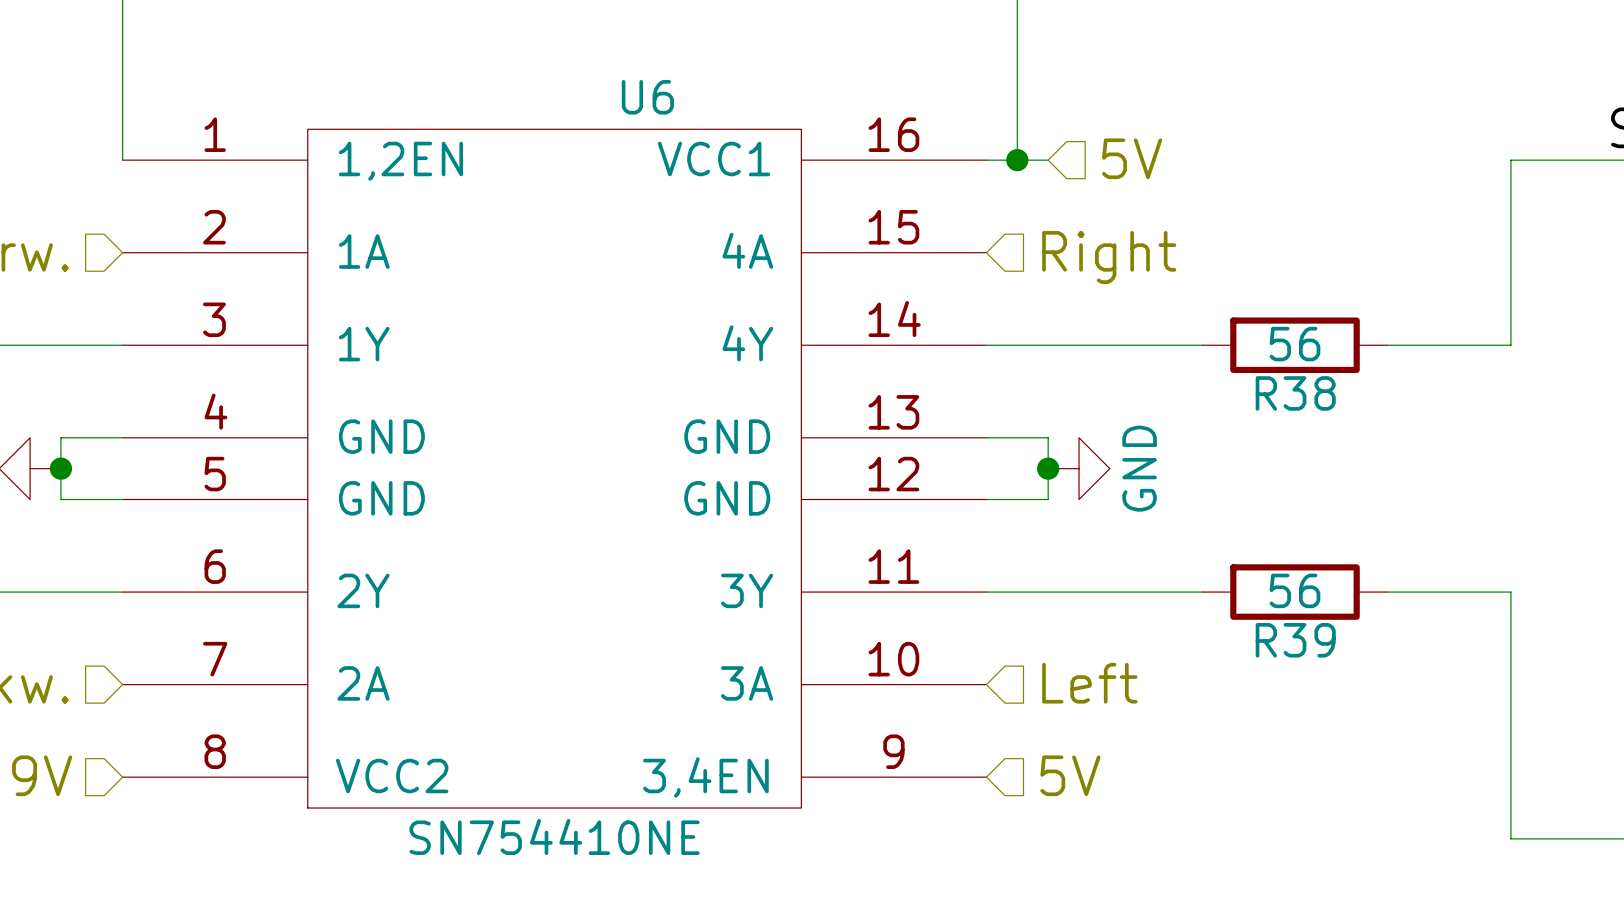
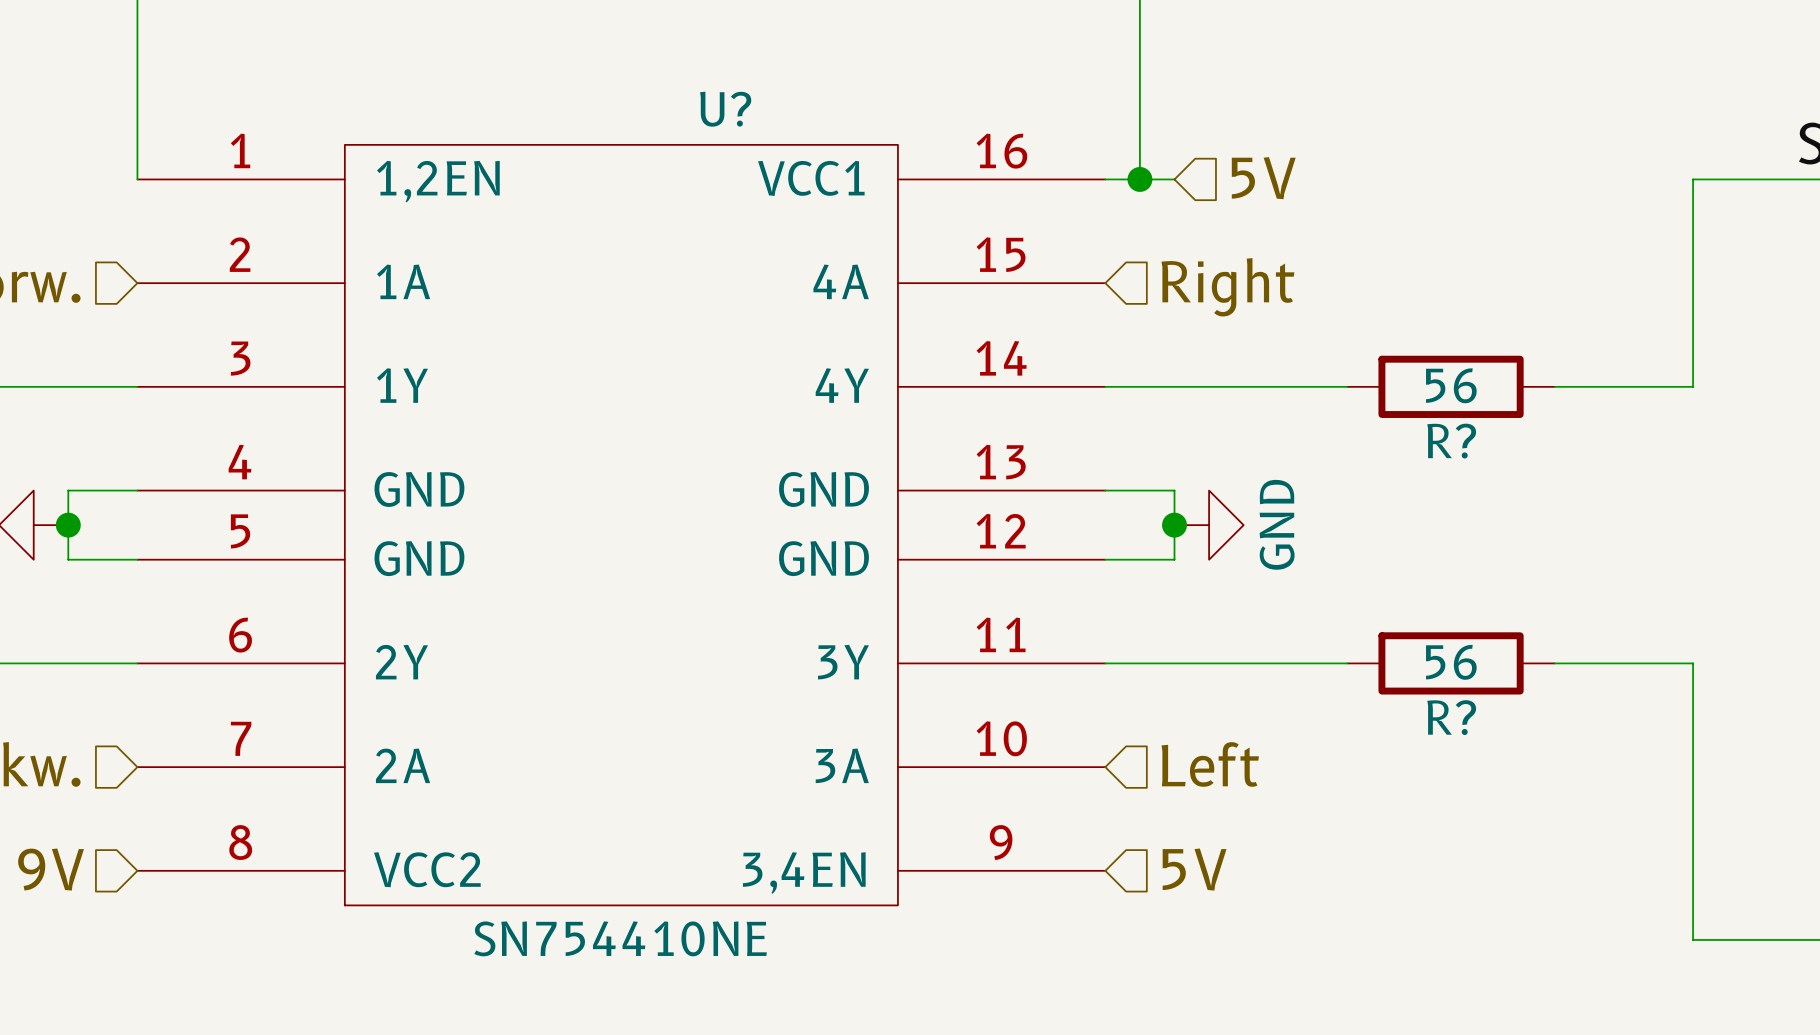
U6 name: U6 (647, 97) -> U? (725, 109)
R38 name: R38 (1295, 393) -> R? (1451, 441)
R39 name: R39 (1295, 640) -> R? (1451, 717)

